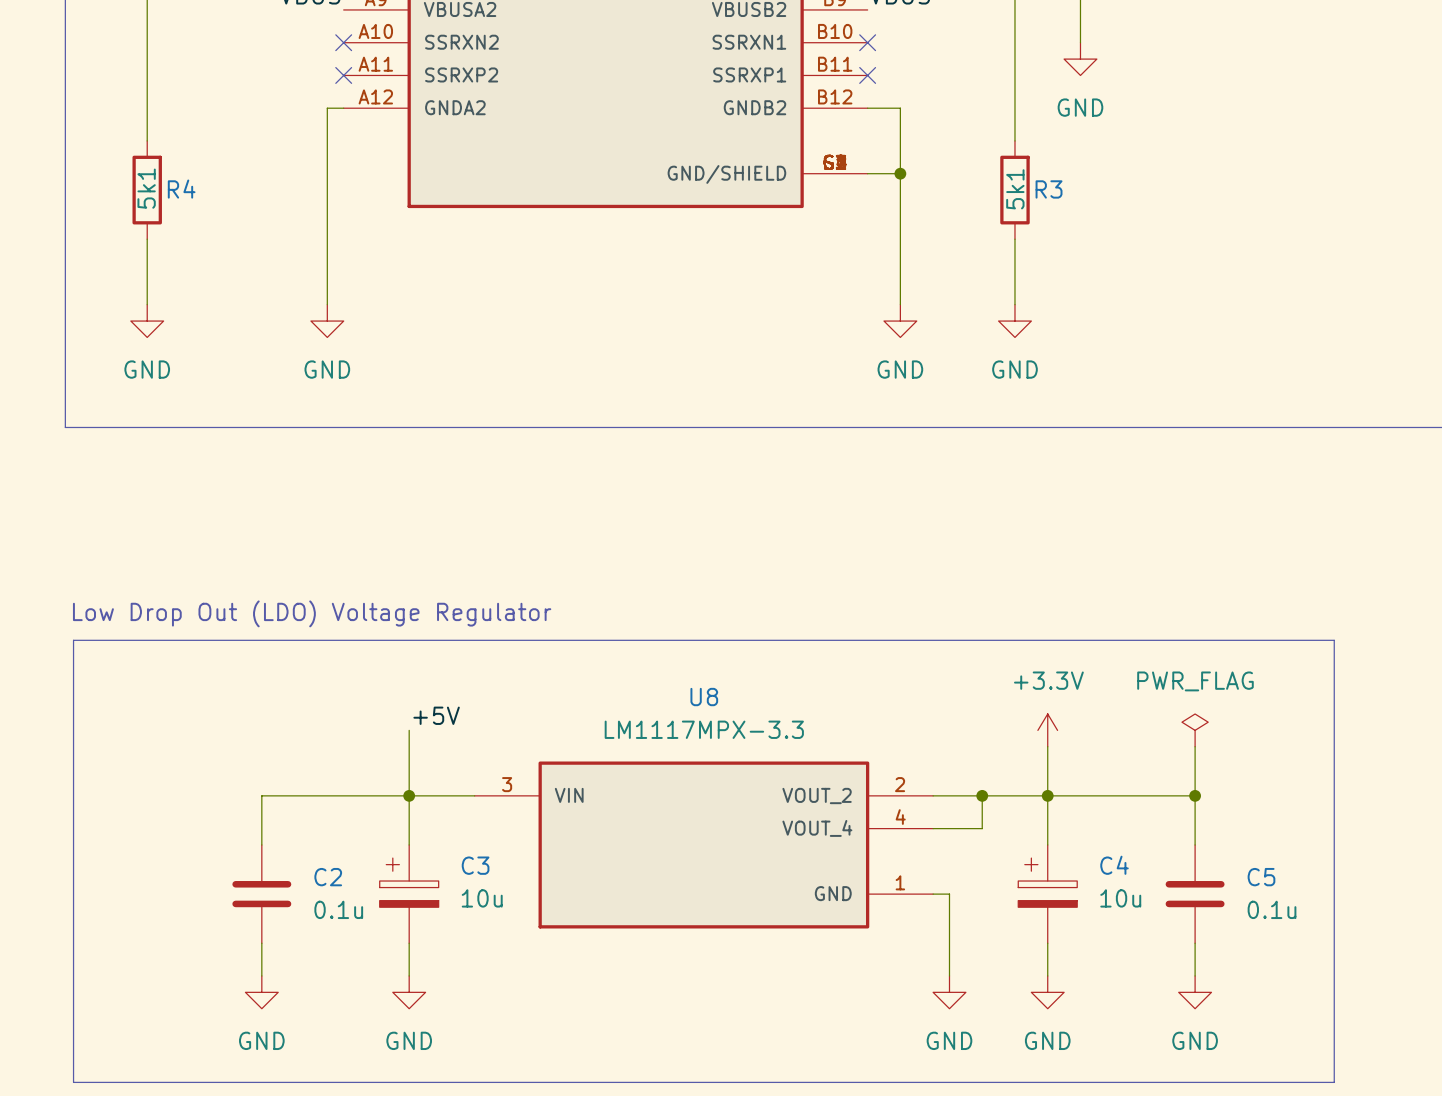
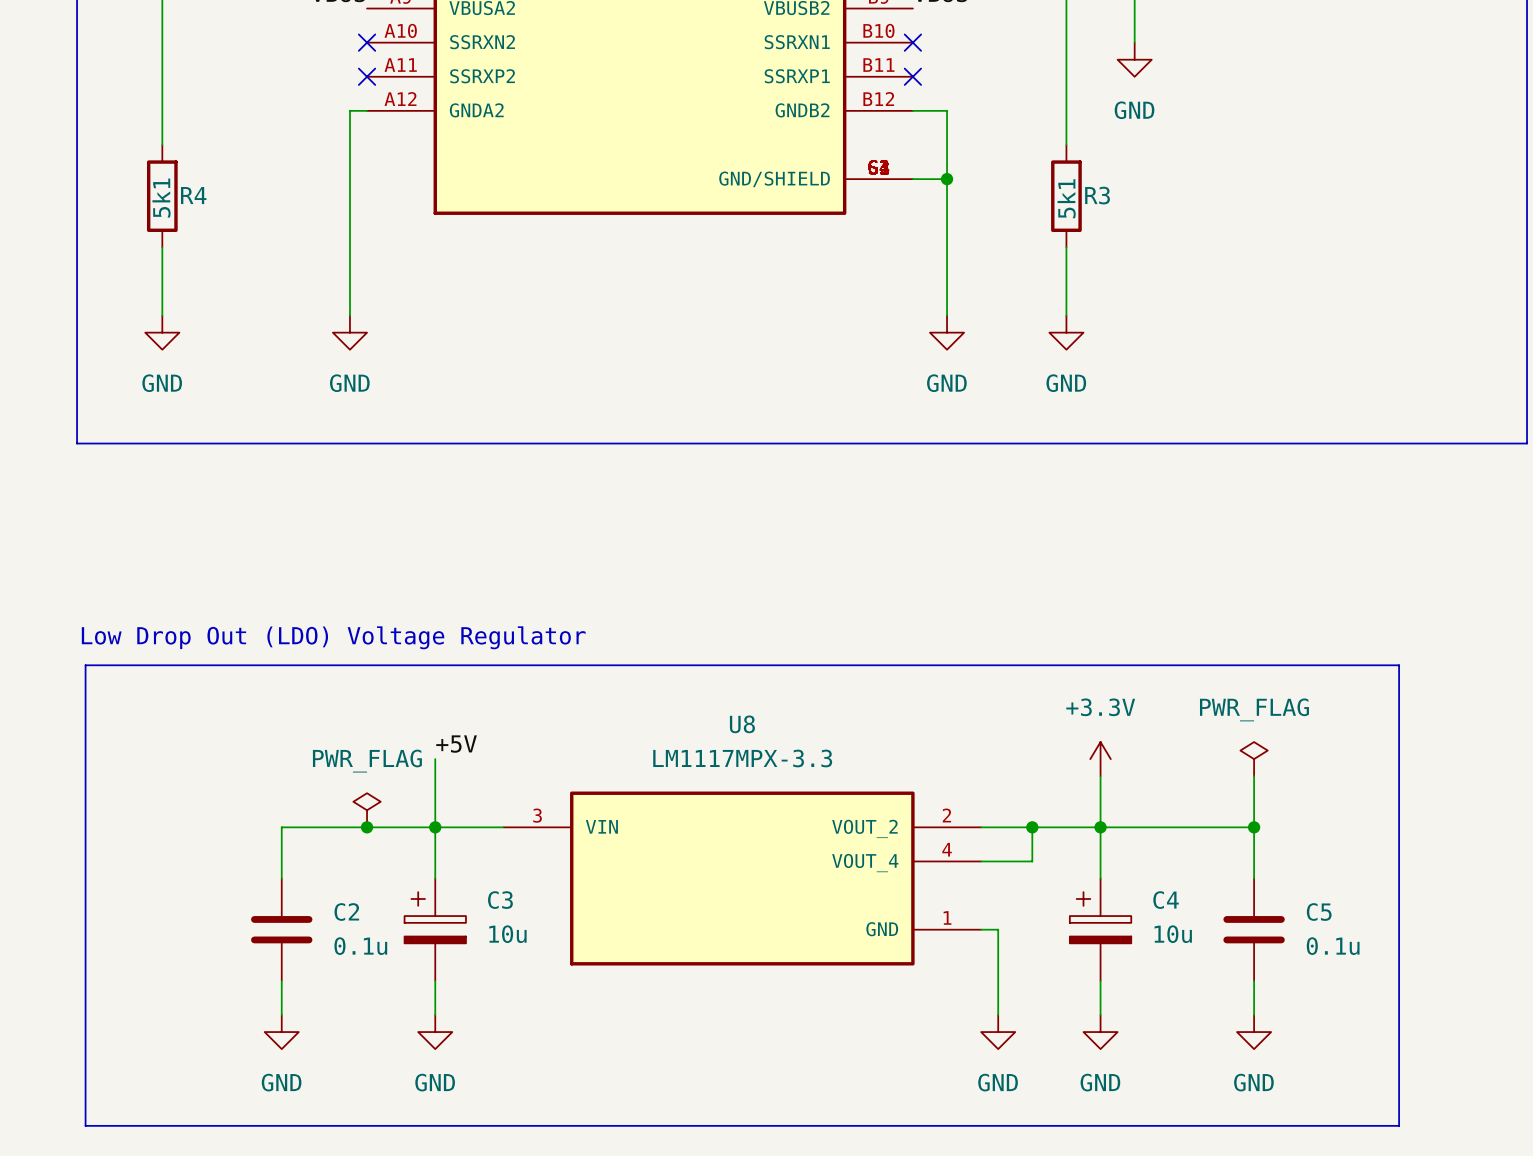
power symbol: none -> PWR_FLAG (367, 810)
junction: none -> (367, 827)

